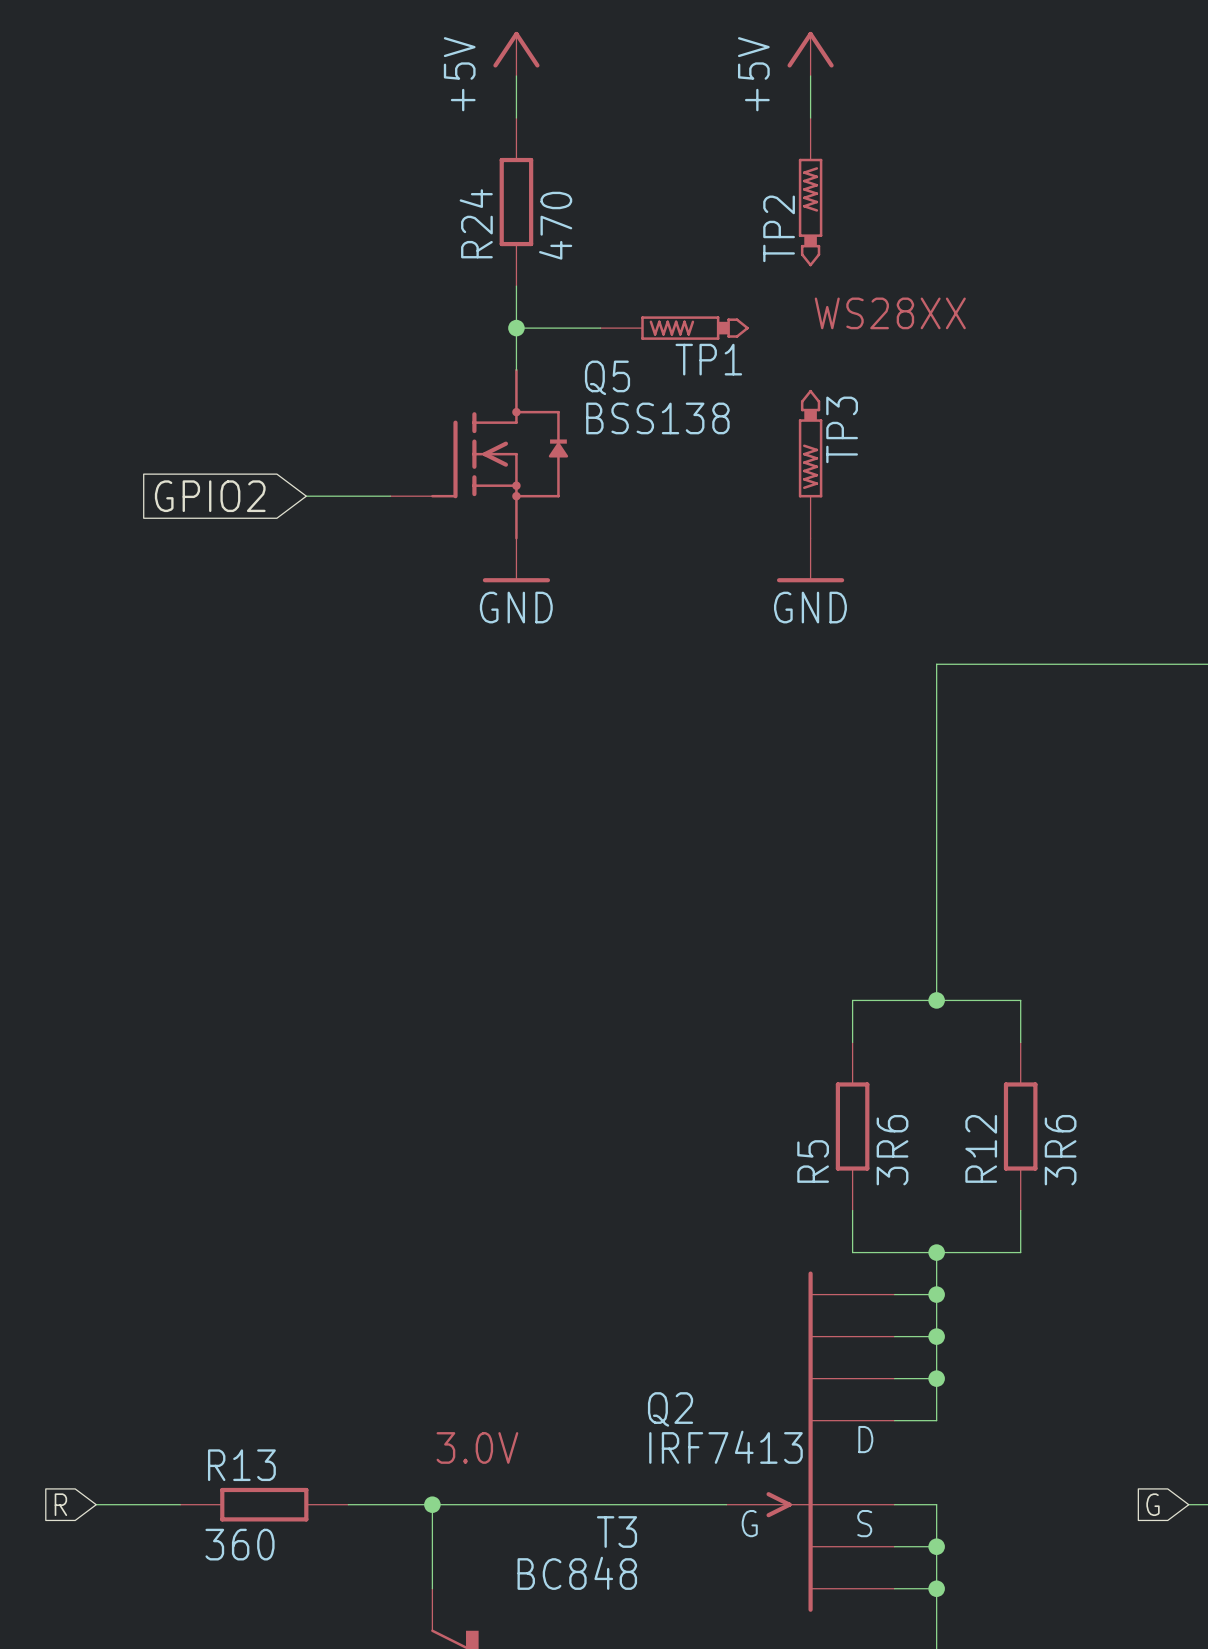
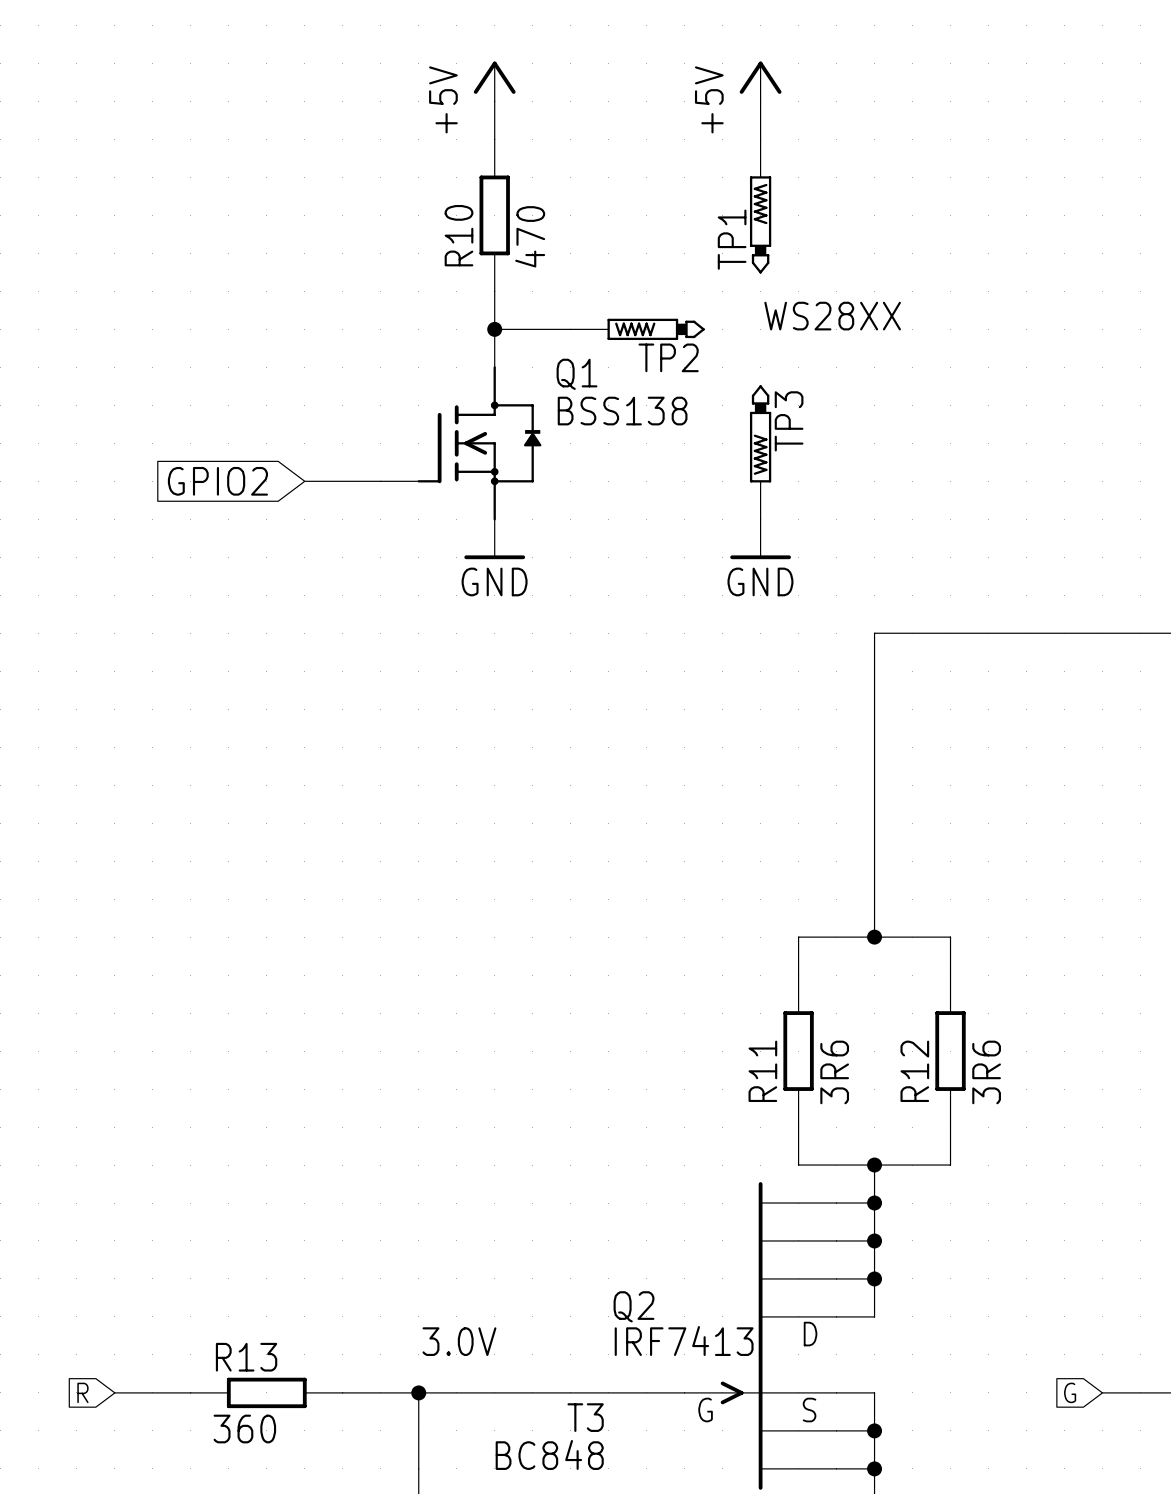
R24 name: R24 (476, 223) -> R10 (459, 235)
TP2 name: TP2 (779, 228) -> TP1 (732, 239)
TP1 name: TP1 (708, 359) -> TP2 (668, 357)
Q5 name: Q5 (607, 377) -> Q1 (577, 374)
R5 name: R5 (813, 1161) -> R11 (762, 1071)

